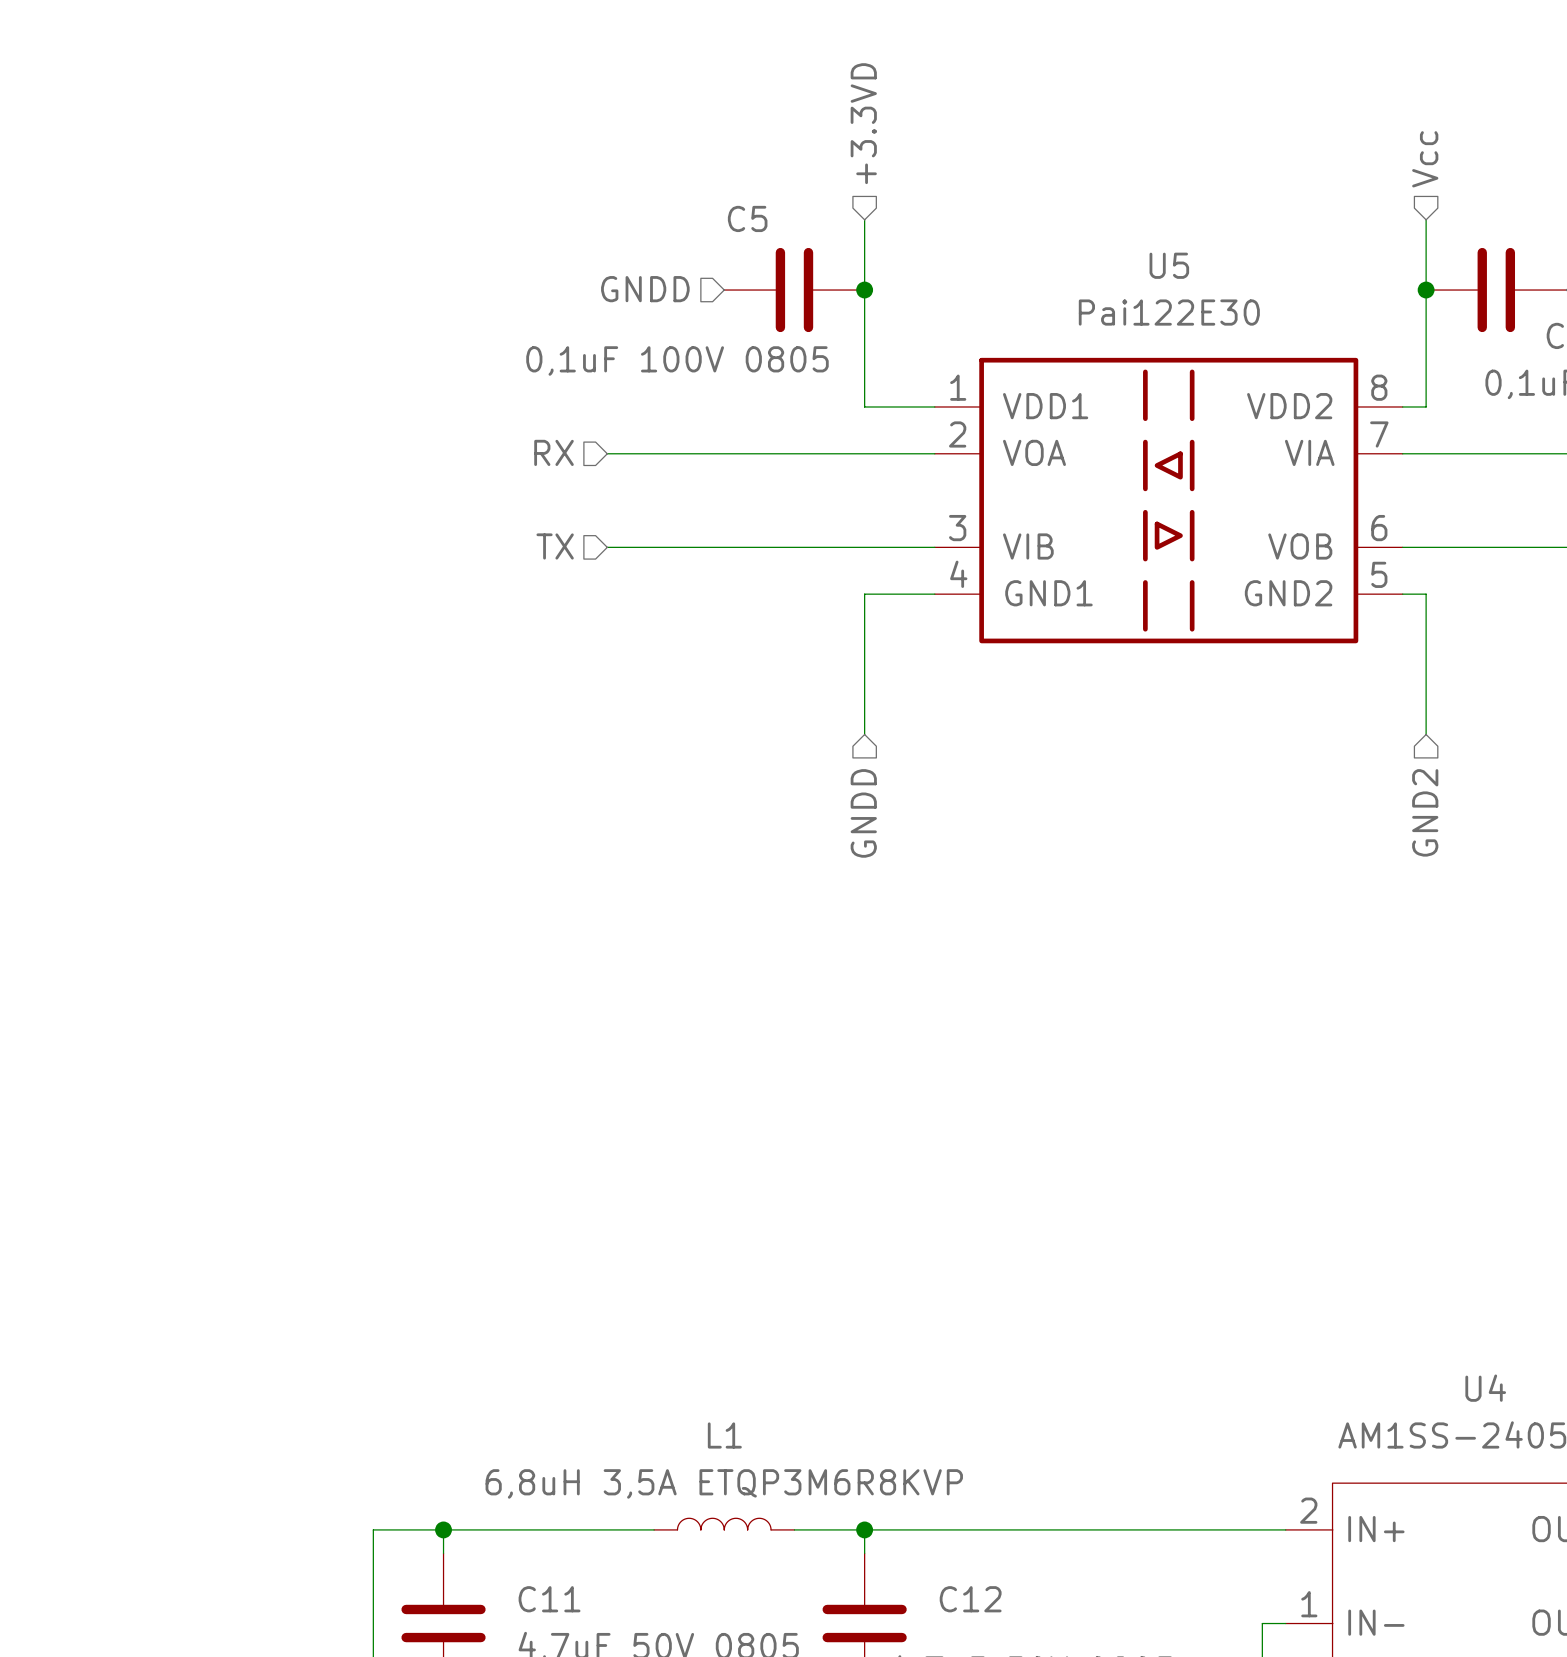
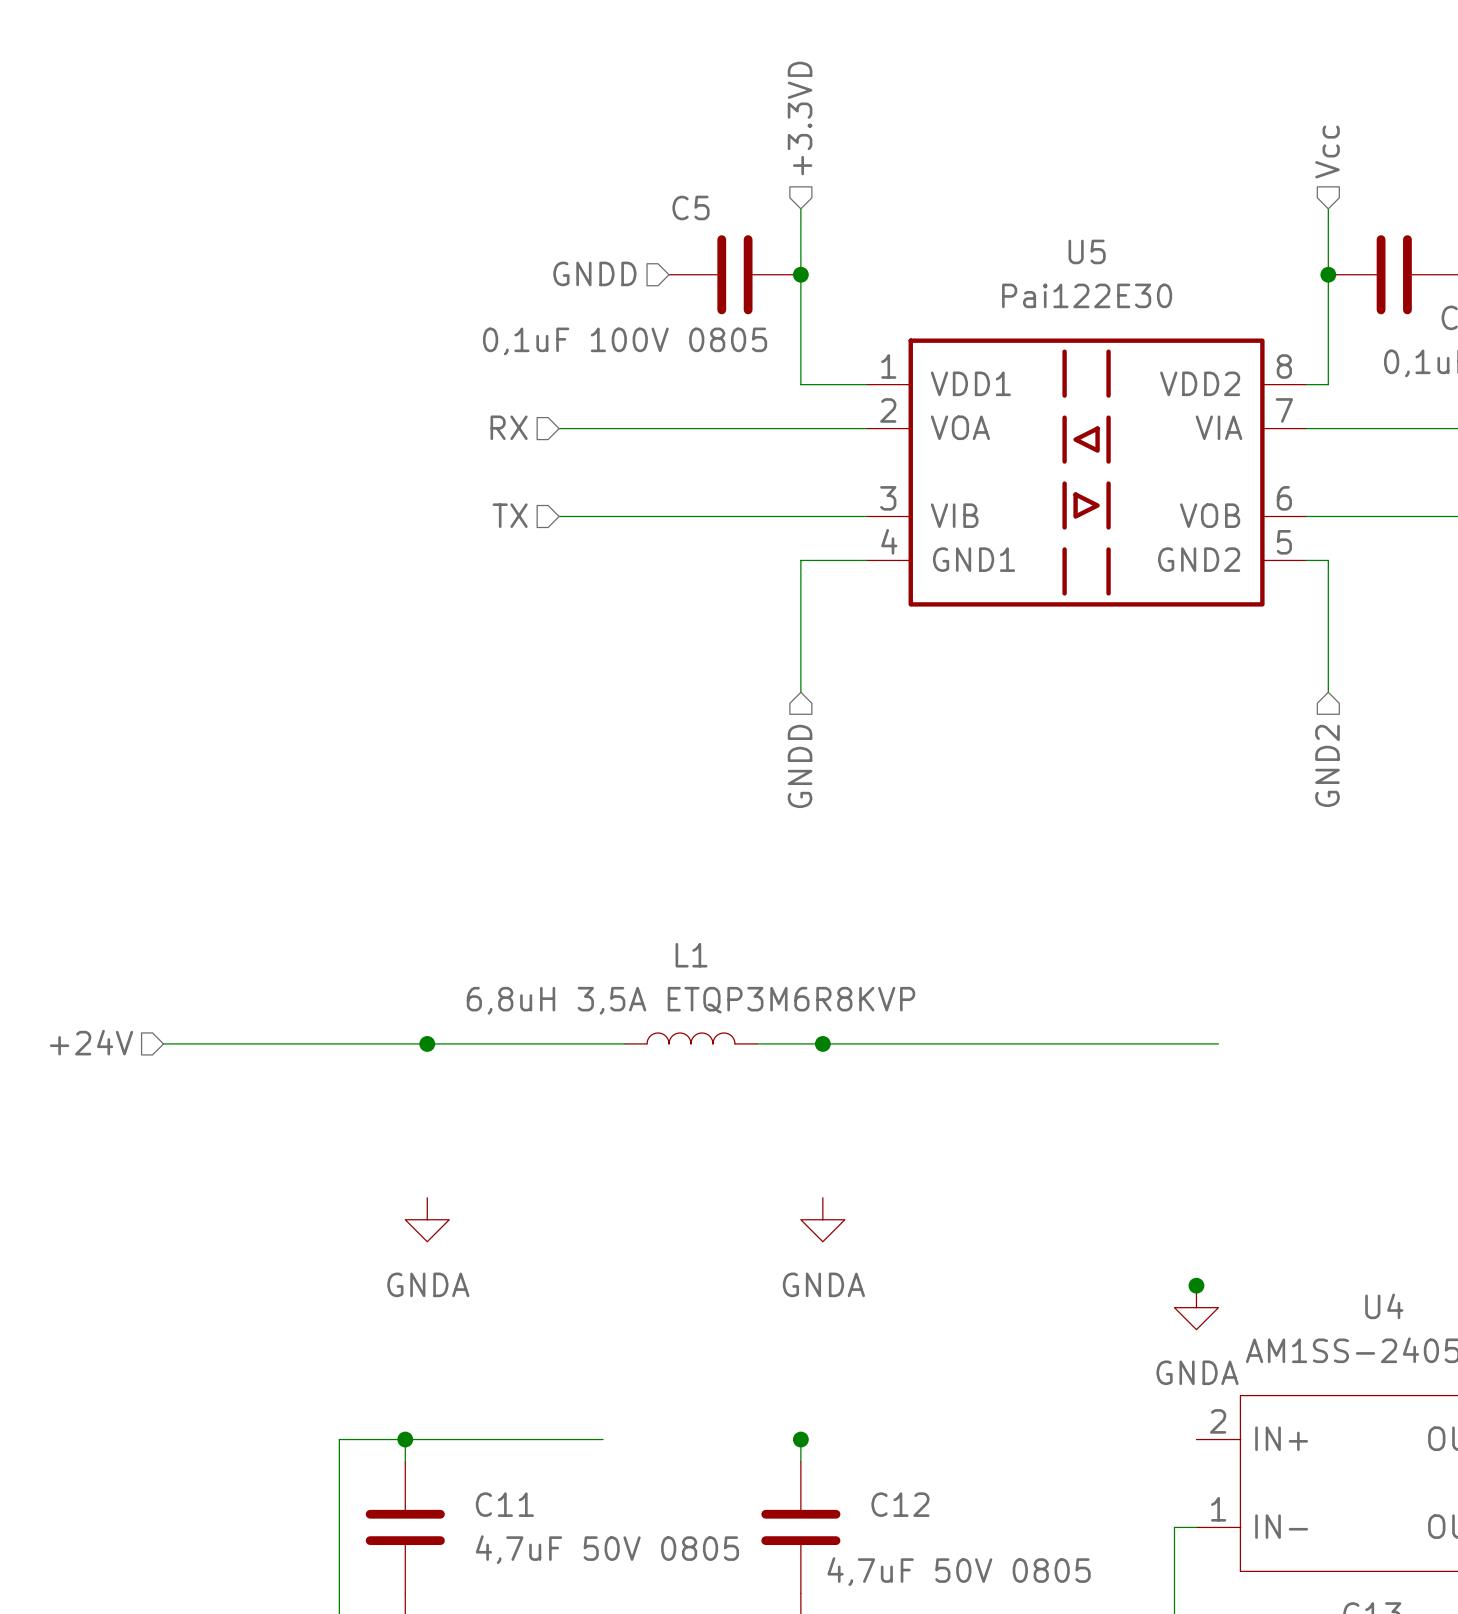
hierarchical label: none -> +24V (91, 1042)
wire: none -> (163, 1043) (625, 1043)
junction: none -> (427, 1043)
junction: none -> (822, 1043)
power symbol: none -> GNDA (427, 1219)
power symbol: none -> GNDA (822, 1219)
junction: none -> (1196, 1285)
power symbol: none -> GNDA (1196, 1307)
L1 position: (724, 1524) -> (690, 1038)
wire: (794, 1529) (1285, 1529) -> (756, 1043) (1218, 1043)

